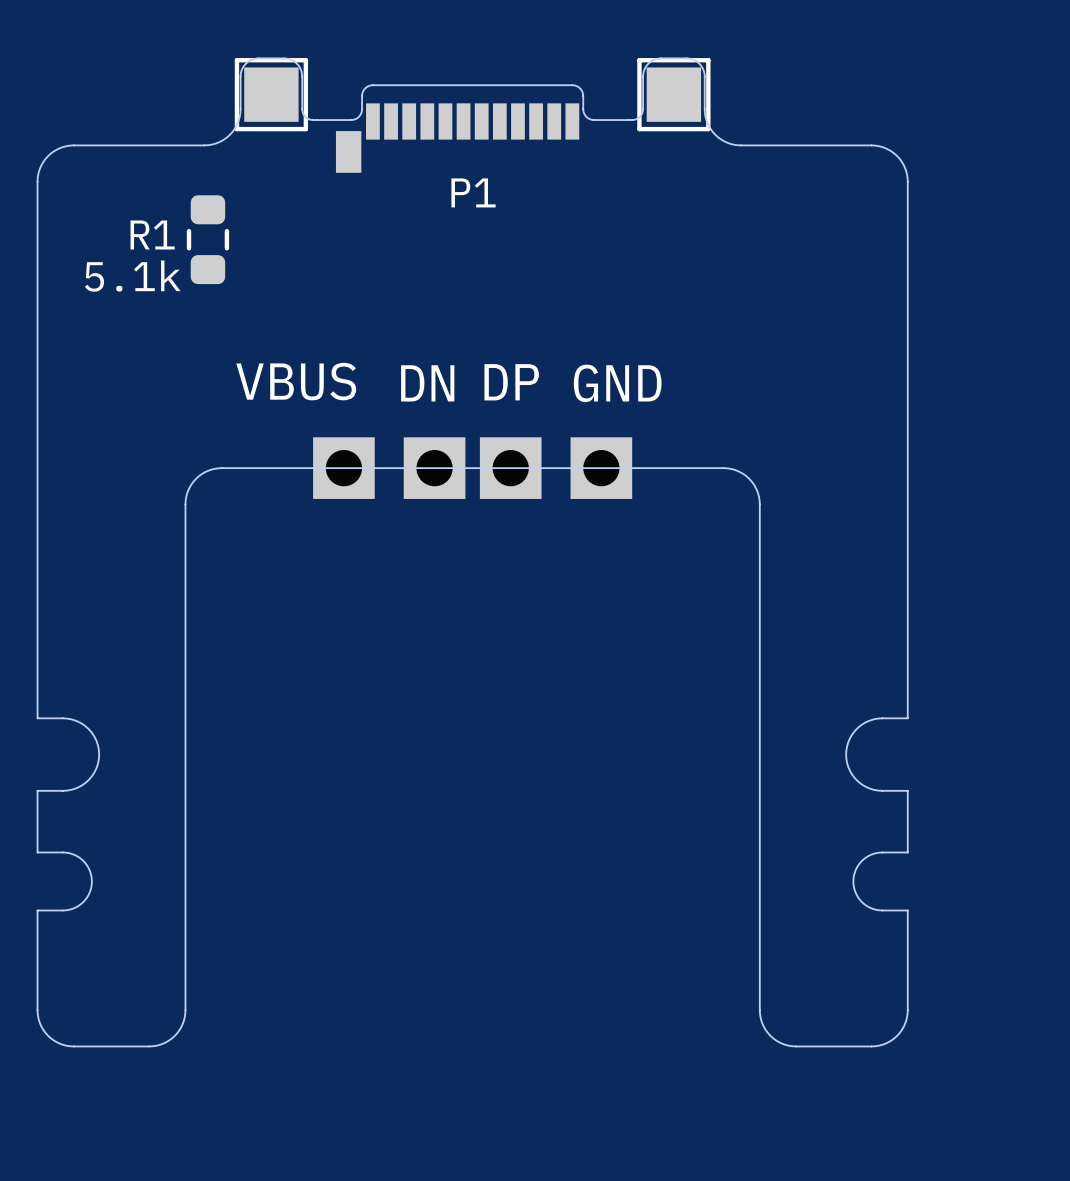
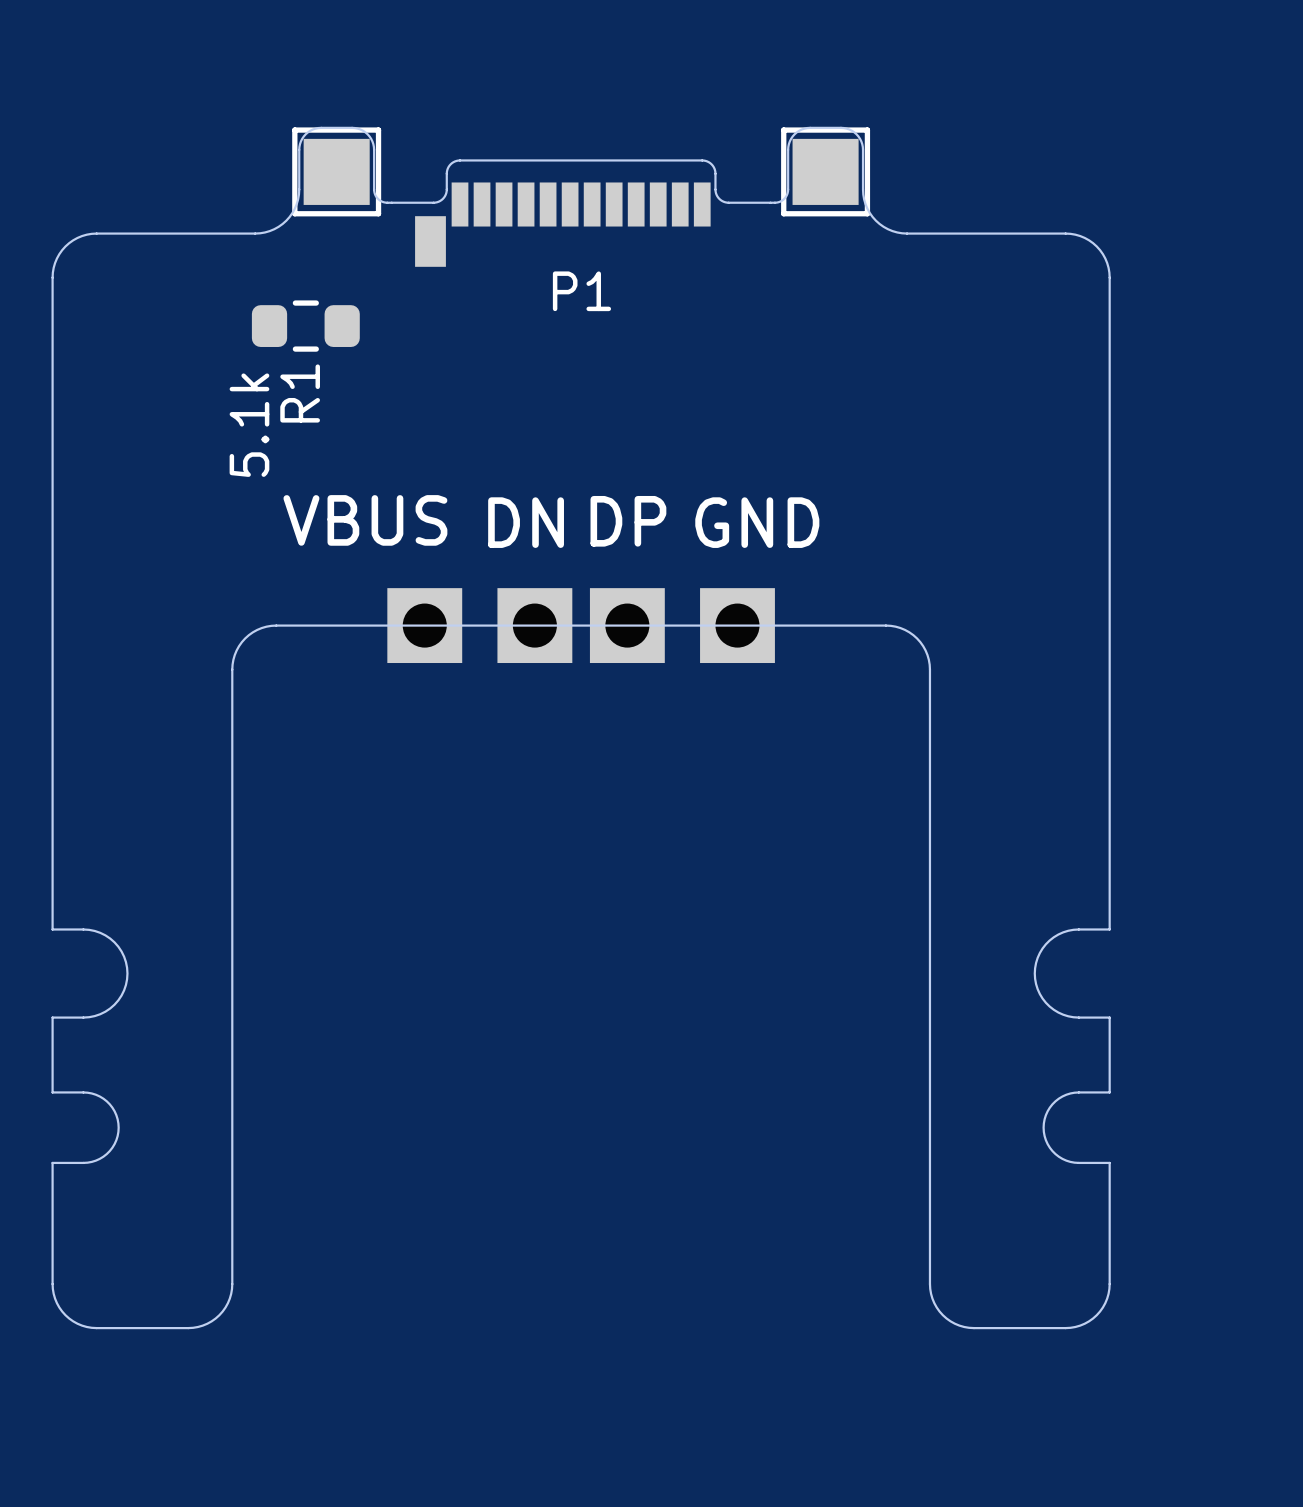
R1 name position: R1 (152, 234) -> R1 (300, 393)
R1 rotation: 0° (207, 239) -> 90° clockwise (305, 326)
text rotation: 0° (132, 276) -> 90° counterclockwise (249, 425)

